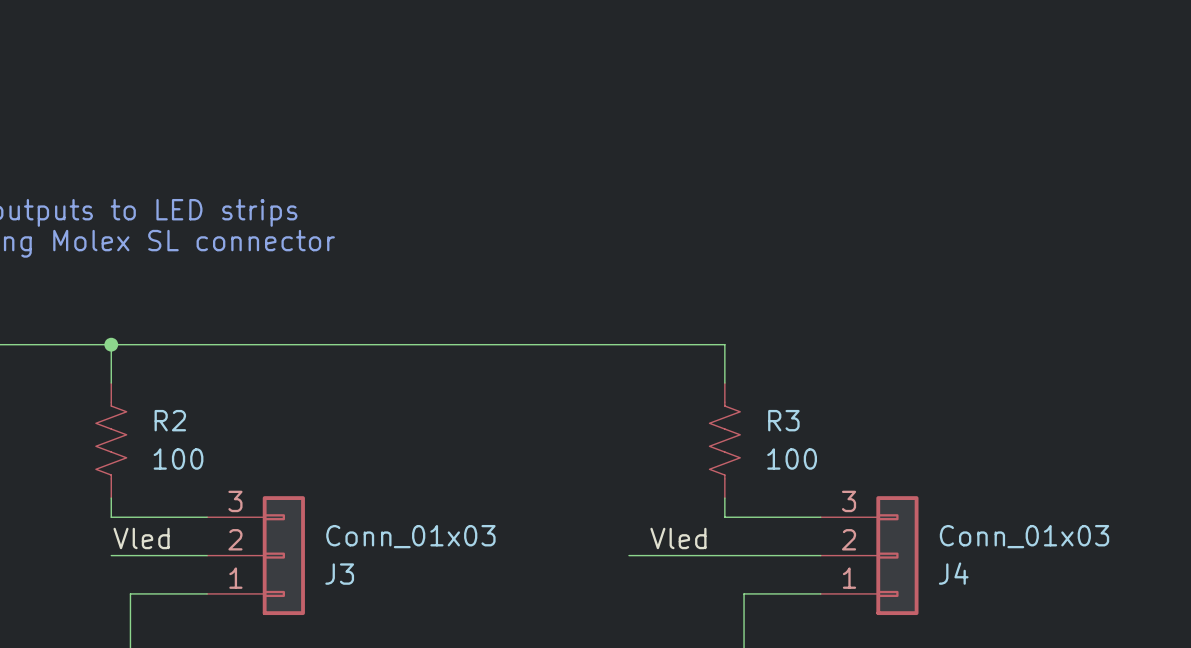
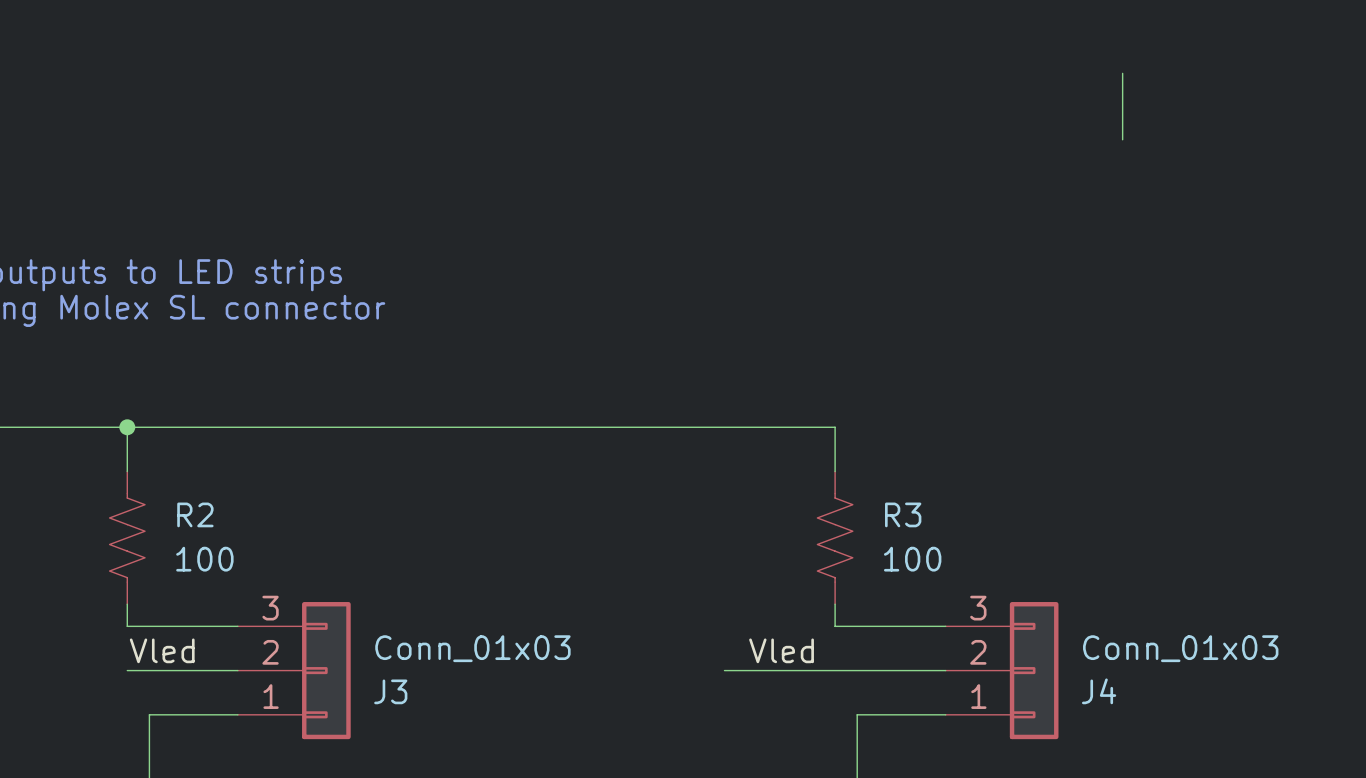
wire: none -> (1122, 73) (1122, 139)

